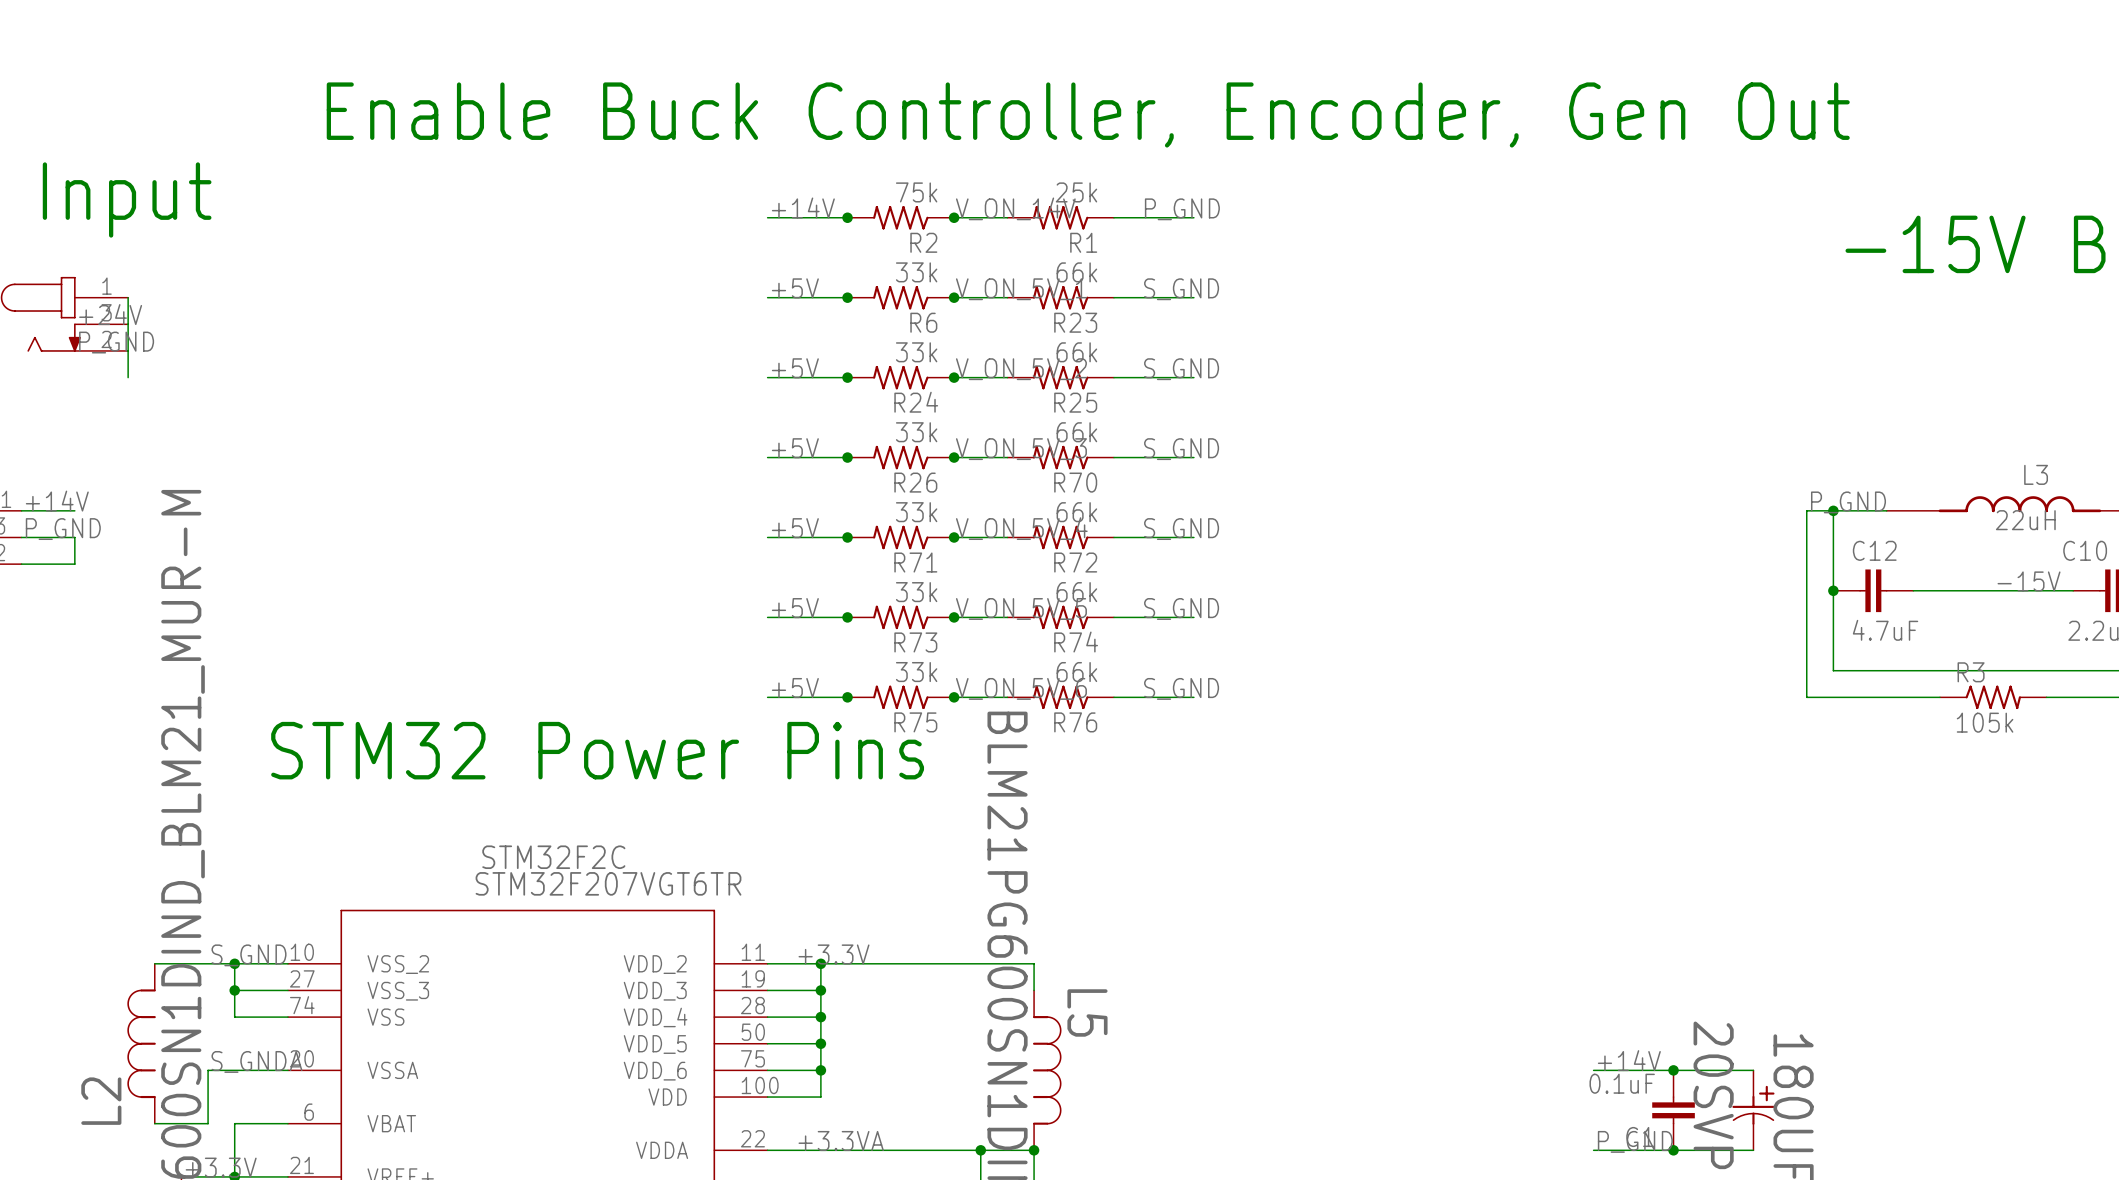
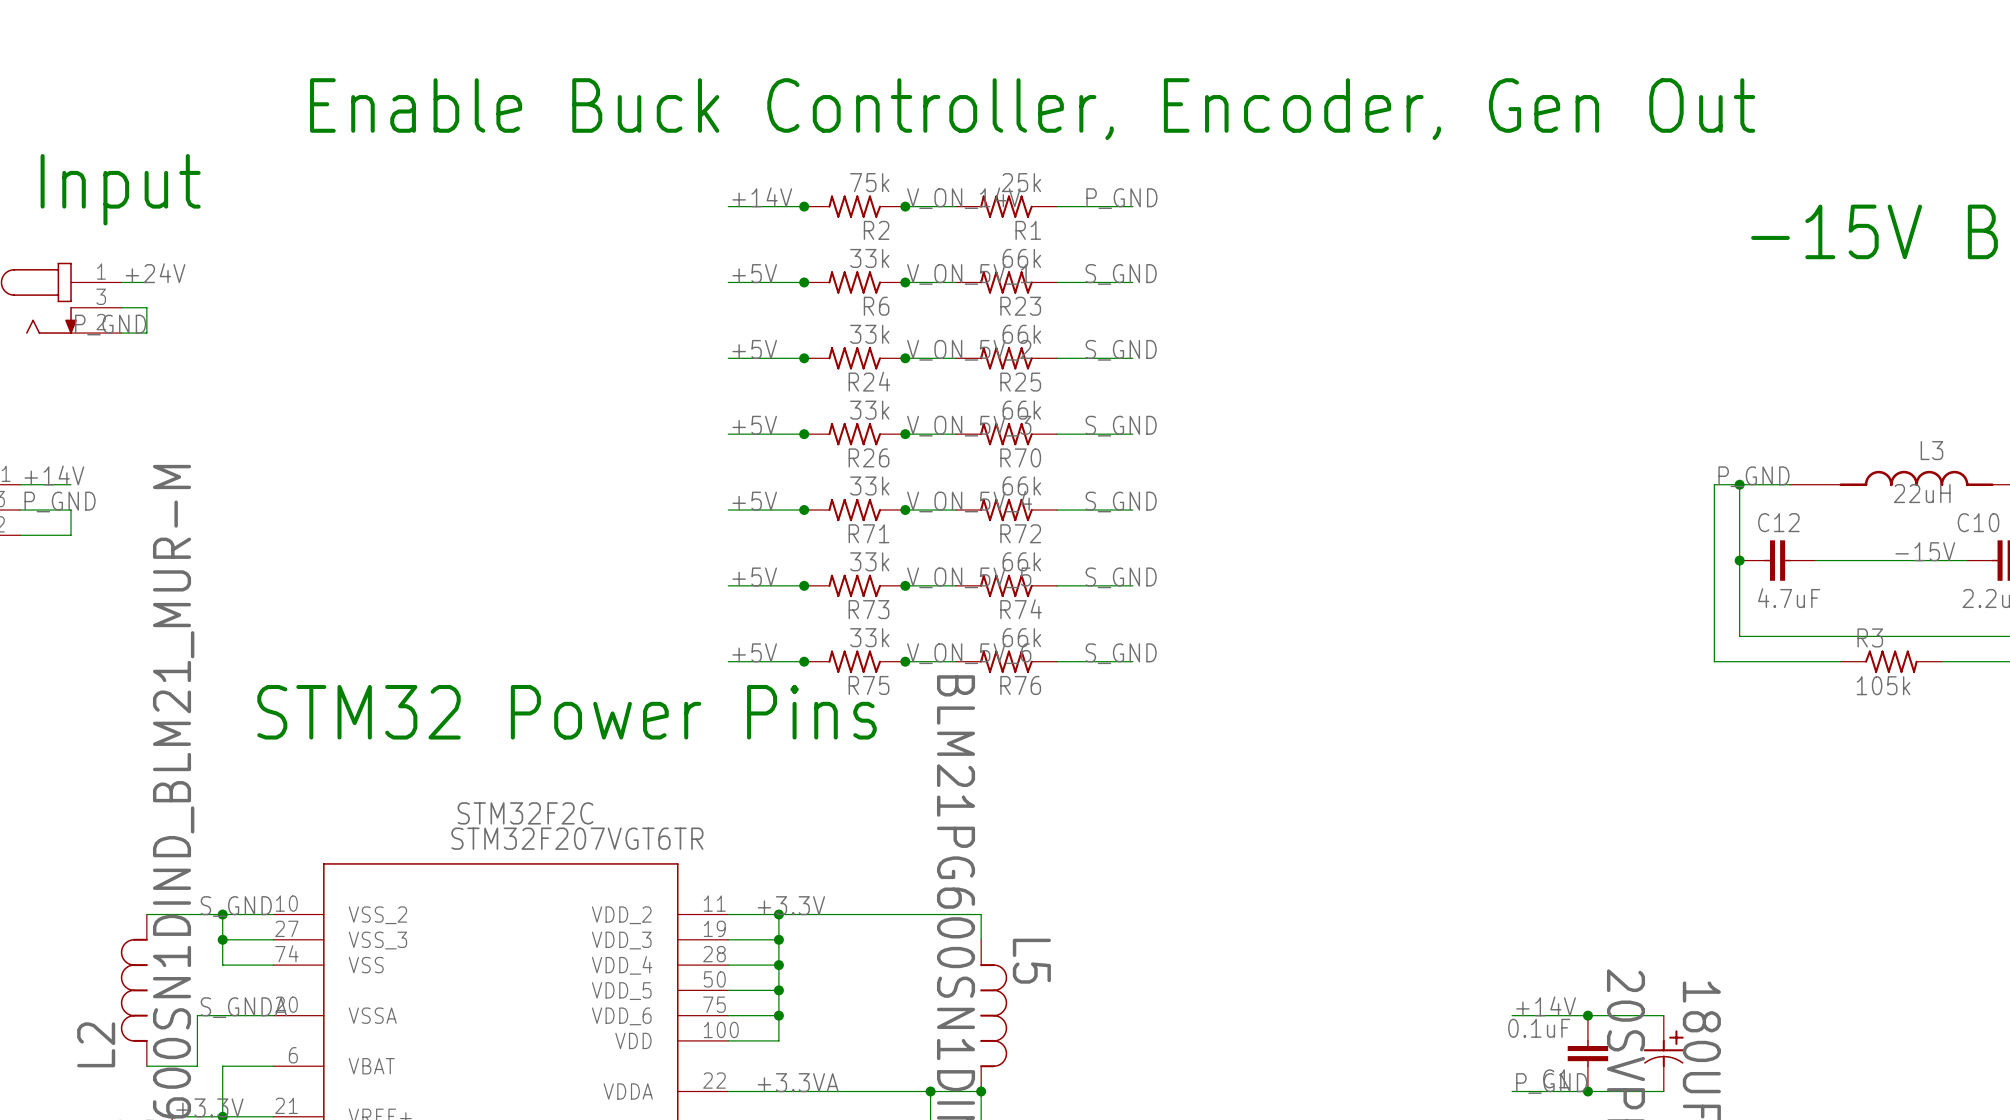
wire: (128, 297) (128, 377) -> (121, 282) (146, 282)
label position: +24V (110, 314) -> +24V (155, 273)
wire: none -> (121, 307) (146, 307) (146, 333) (121, 333)

